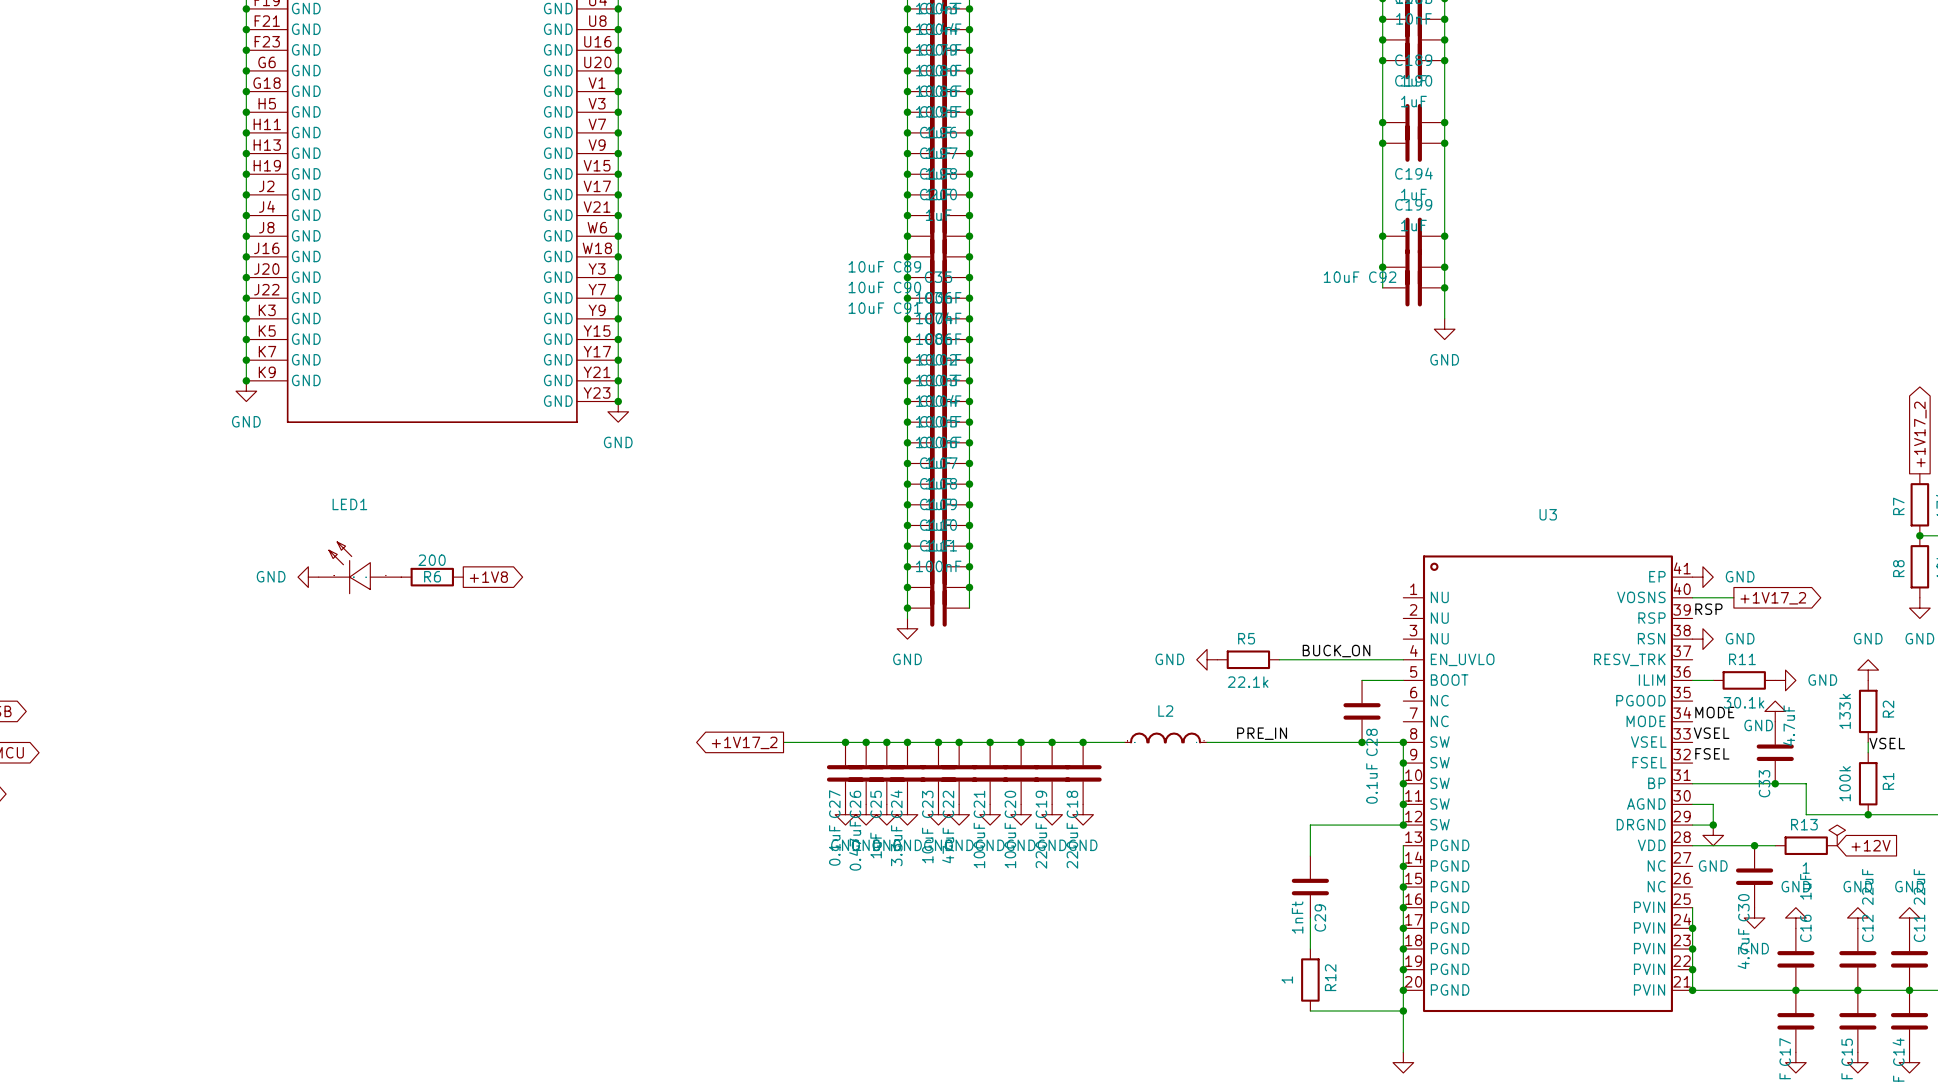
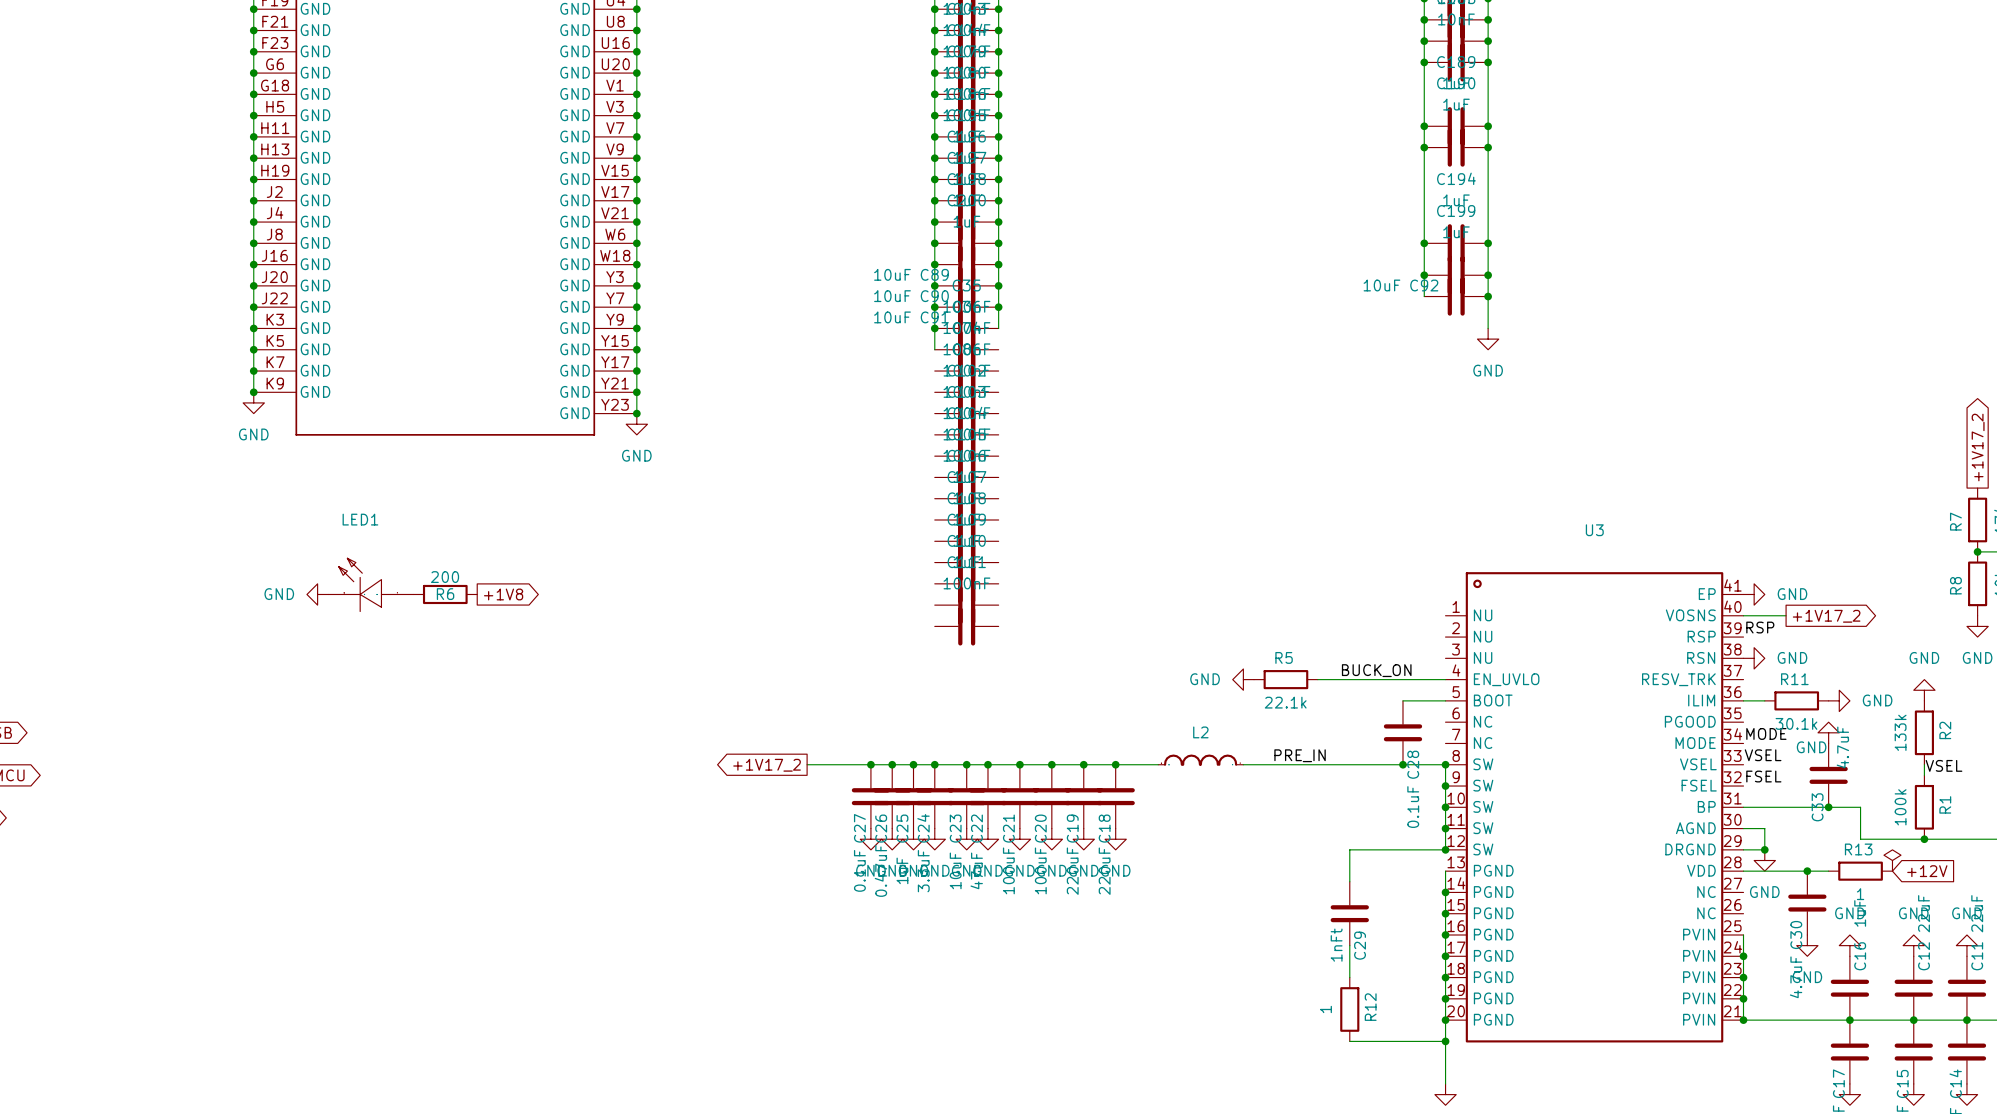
wire: (969, 318) (969, 608) -> none
junction: (969, 318) -> none
wire: (907, 339) (907, 618) -> none
junction: (907, 339) -> none
junction: (969, 339) -> none
junction: (907, 360) -> none
junction: (969, 360) -> none
junction: (907, 380) -> none
junction: (969, 380) -> none
junction: (907, 401) -> none
junction: (969, 401) -> none
junction: (907, 422) -> none
junction: (969, 422) -> none
junction: (907, 442) -> none
junction: (969, 442) -> none
junction: (907, 463) -> none
junction: (969, 463) -> none
junction: (907, 484) -> none
junction: (969, 484) -> none
junction: (907, 504) -> none
junction: (969, 504) -> none
junction: (907, 525) -> none
junction: (969, 525) -> none
junction: (907, 546) -> none
junction: (969, 546) -> none
junction: (907, 566) -> none
junction: (969, 566) -> none
junction: (907, 587) -> none
junction: (969, 587) -> none
junction: (907, 608) -> none
power symbol: GND (907, 628) -> none

